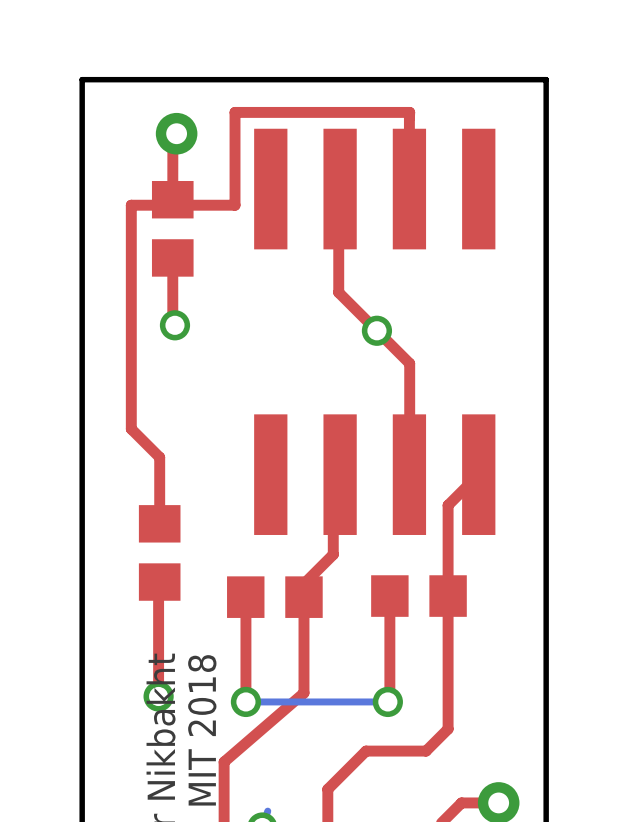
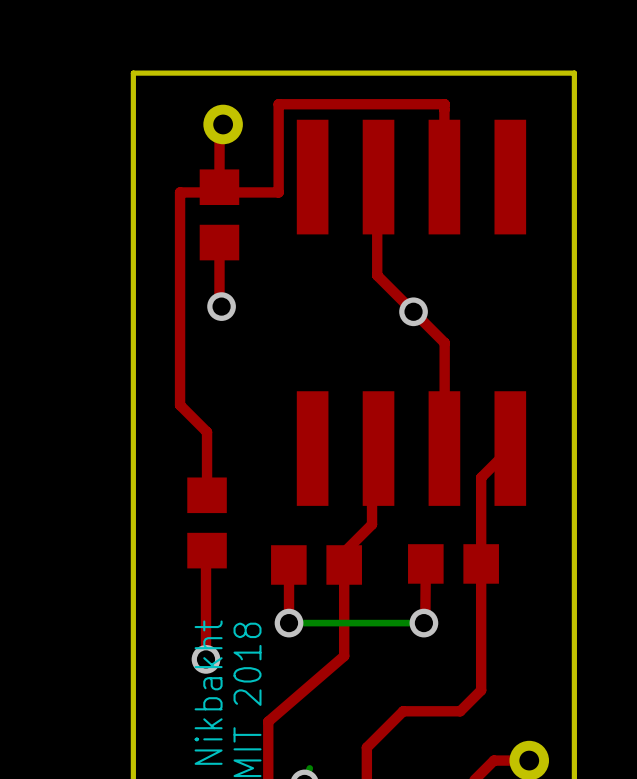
top track: (389, 596) (389, 699) (387, 701) -> (425, 563) (423, 623)
top track: (245, 658) (245, 701) -> none
via position: (245, 701) -> (289, 623)
bottom track: (387, 701) (245, 701) -> (423, 623) (289, 623)
via position: (387, 701) -> (423, 623)

